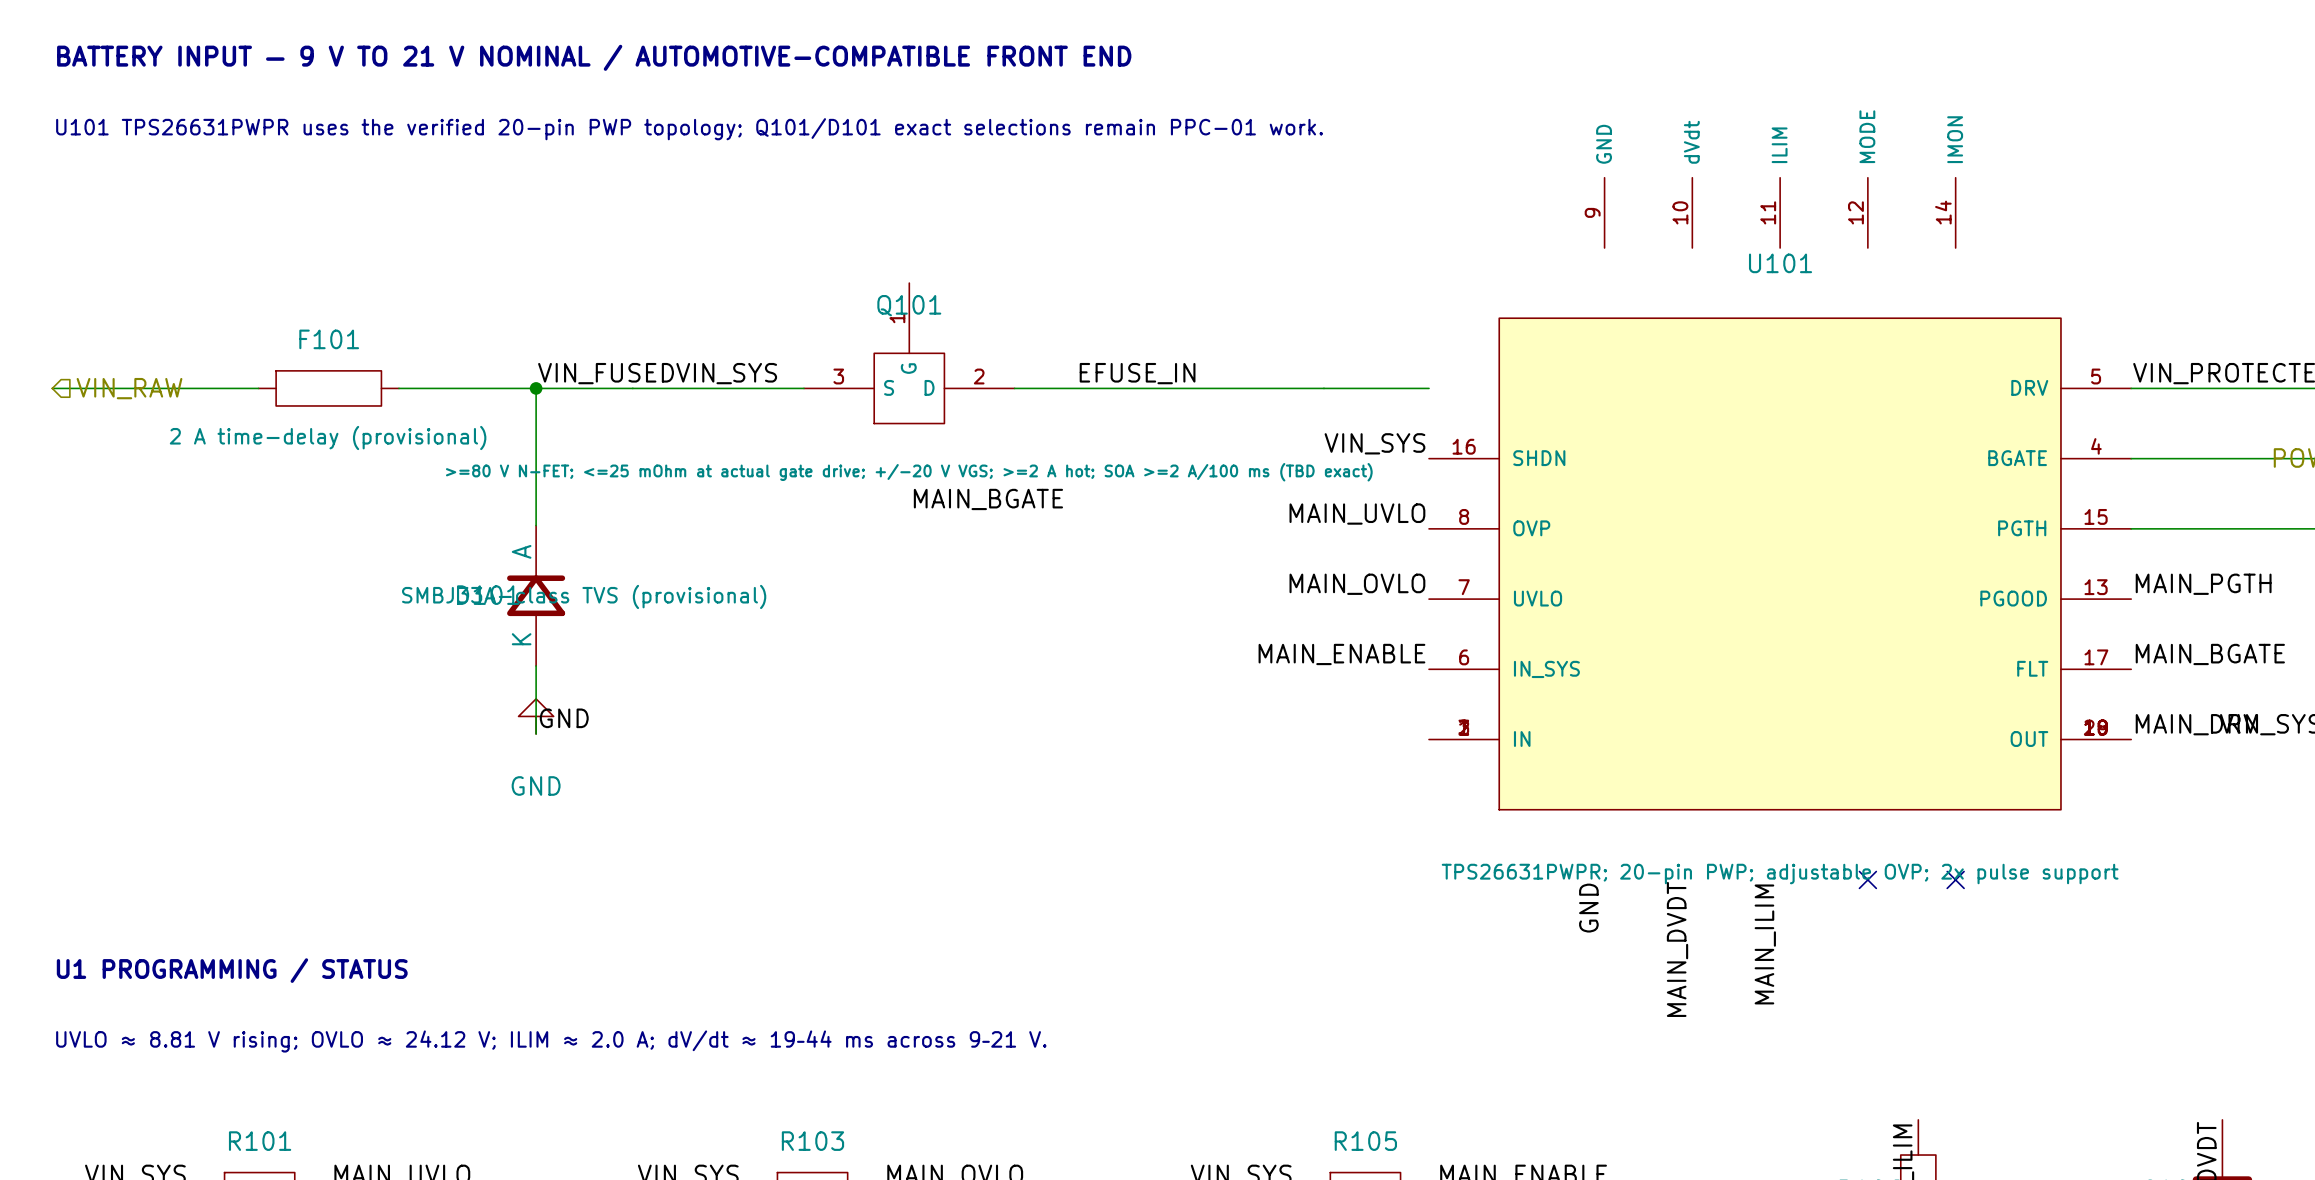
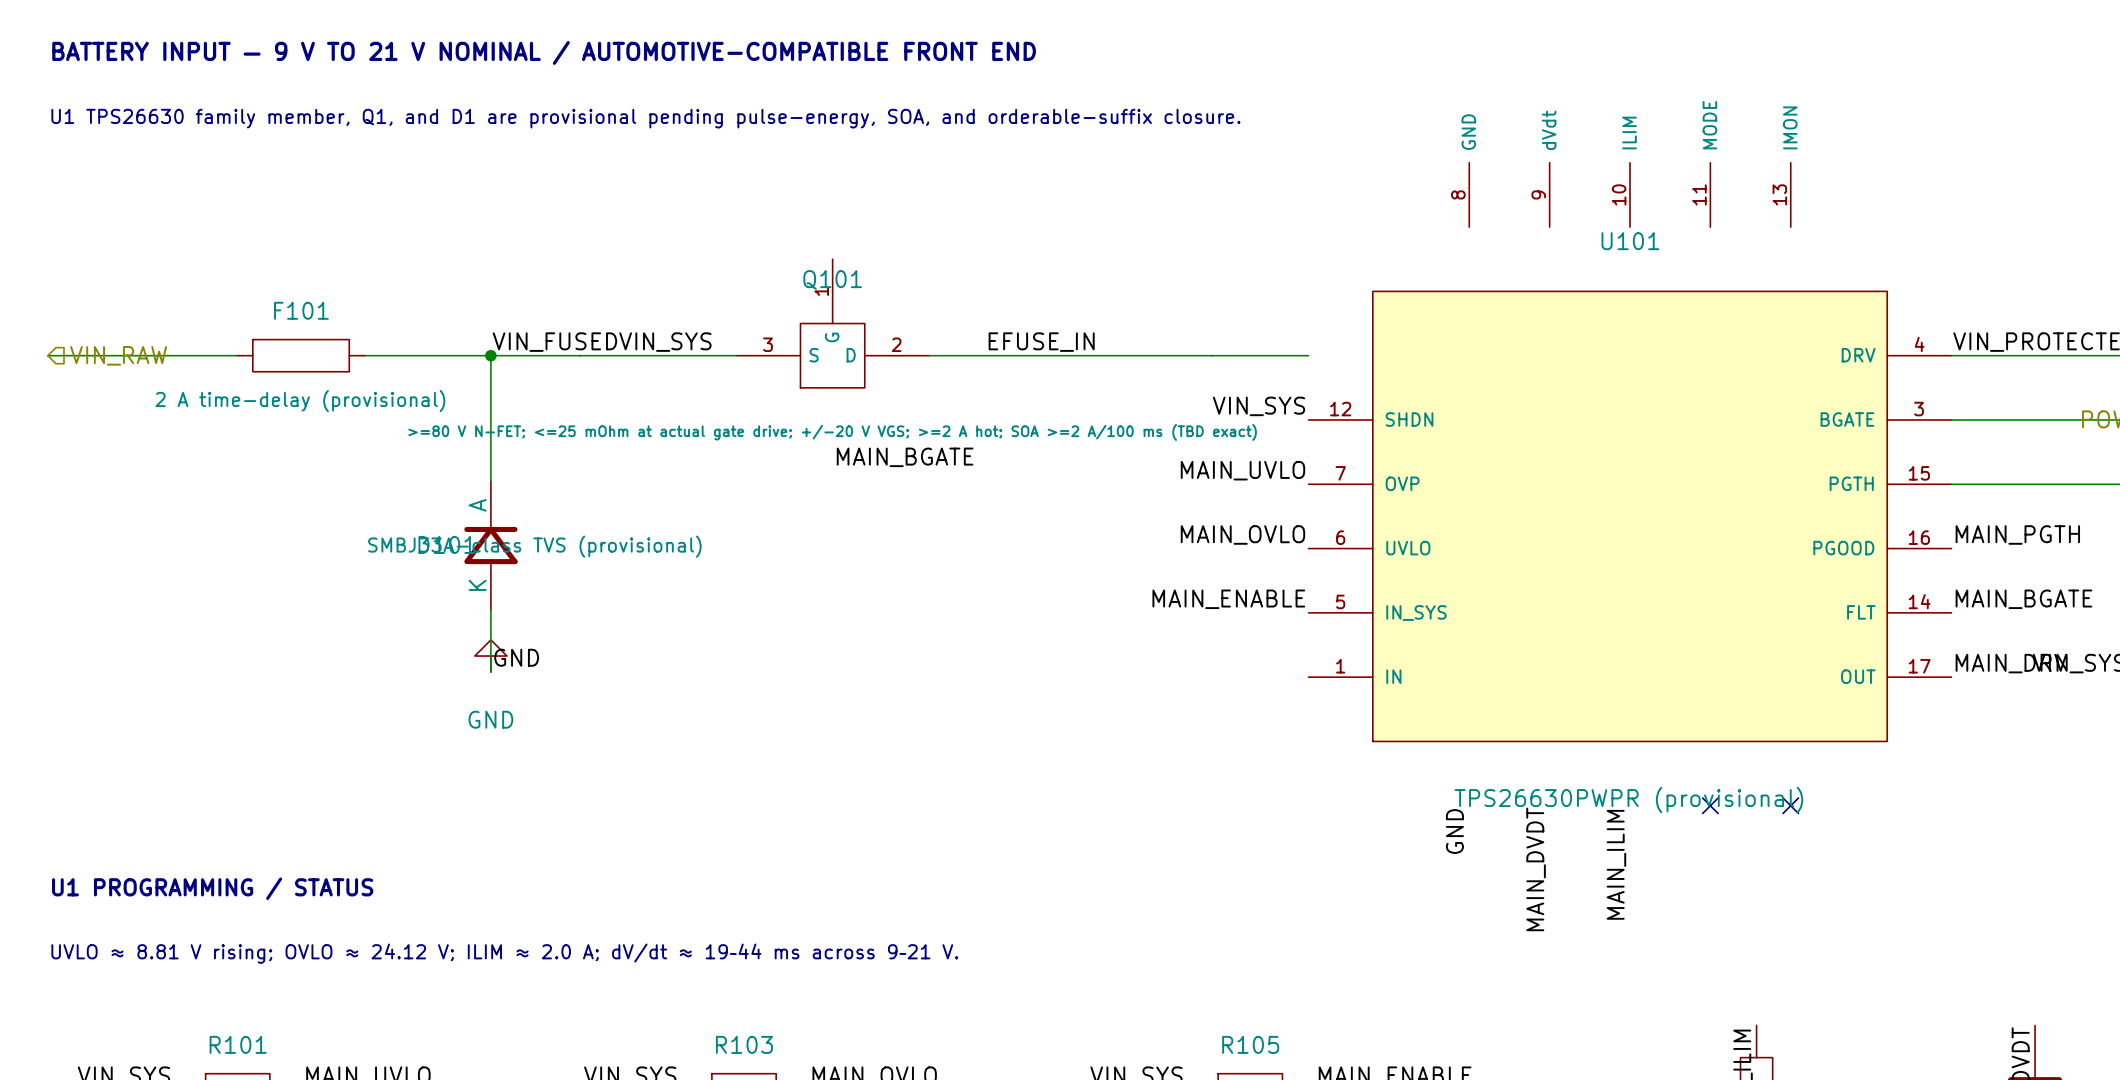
text: U101 TPS26631PWPR uses the verified 20-pin PWP topology; Q101/D101 exact selections remain PPC-01 work. (689, 129) -> U1 TPS26630 family member, Q1, and D1 are provisional pending pulse-energy, SOA, and orderable-suffix closure. (645, 118)
U101 symbol: [1429, 177, 2132, 810] -> [1308, 162, 1952, 742]
U101 value: TPS26631PWPR; 20-pin PWP; adjustable OVP; 2x pulse support (1780, 874) -> TPS26630PWPR (provisional) (1628, 799)

